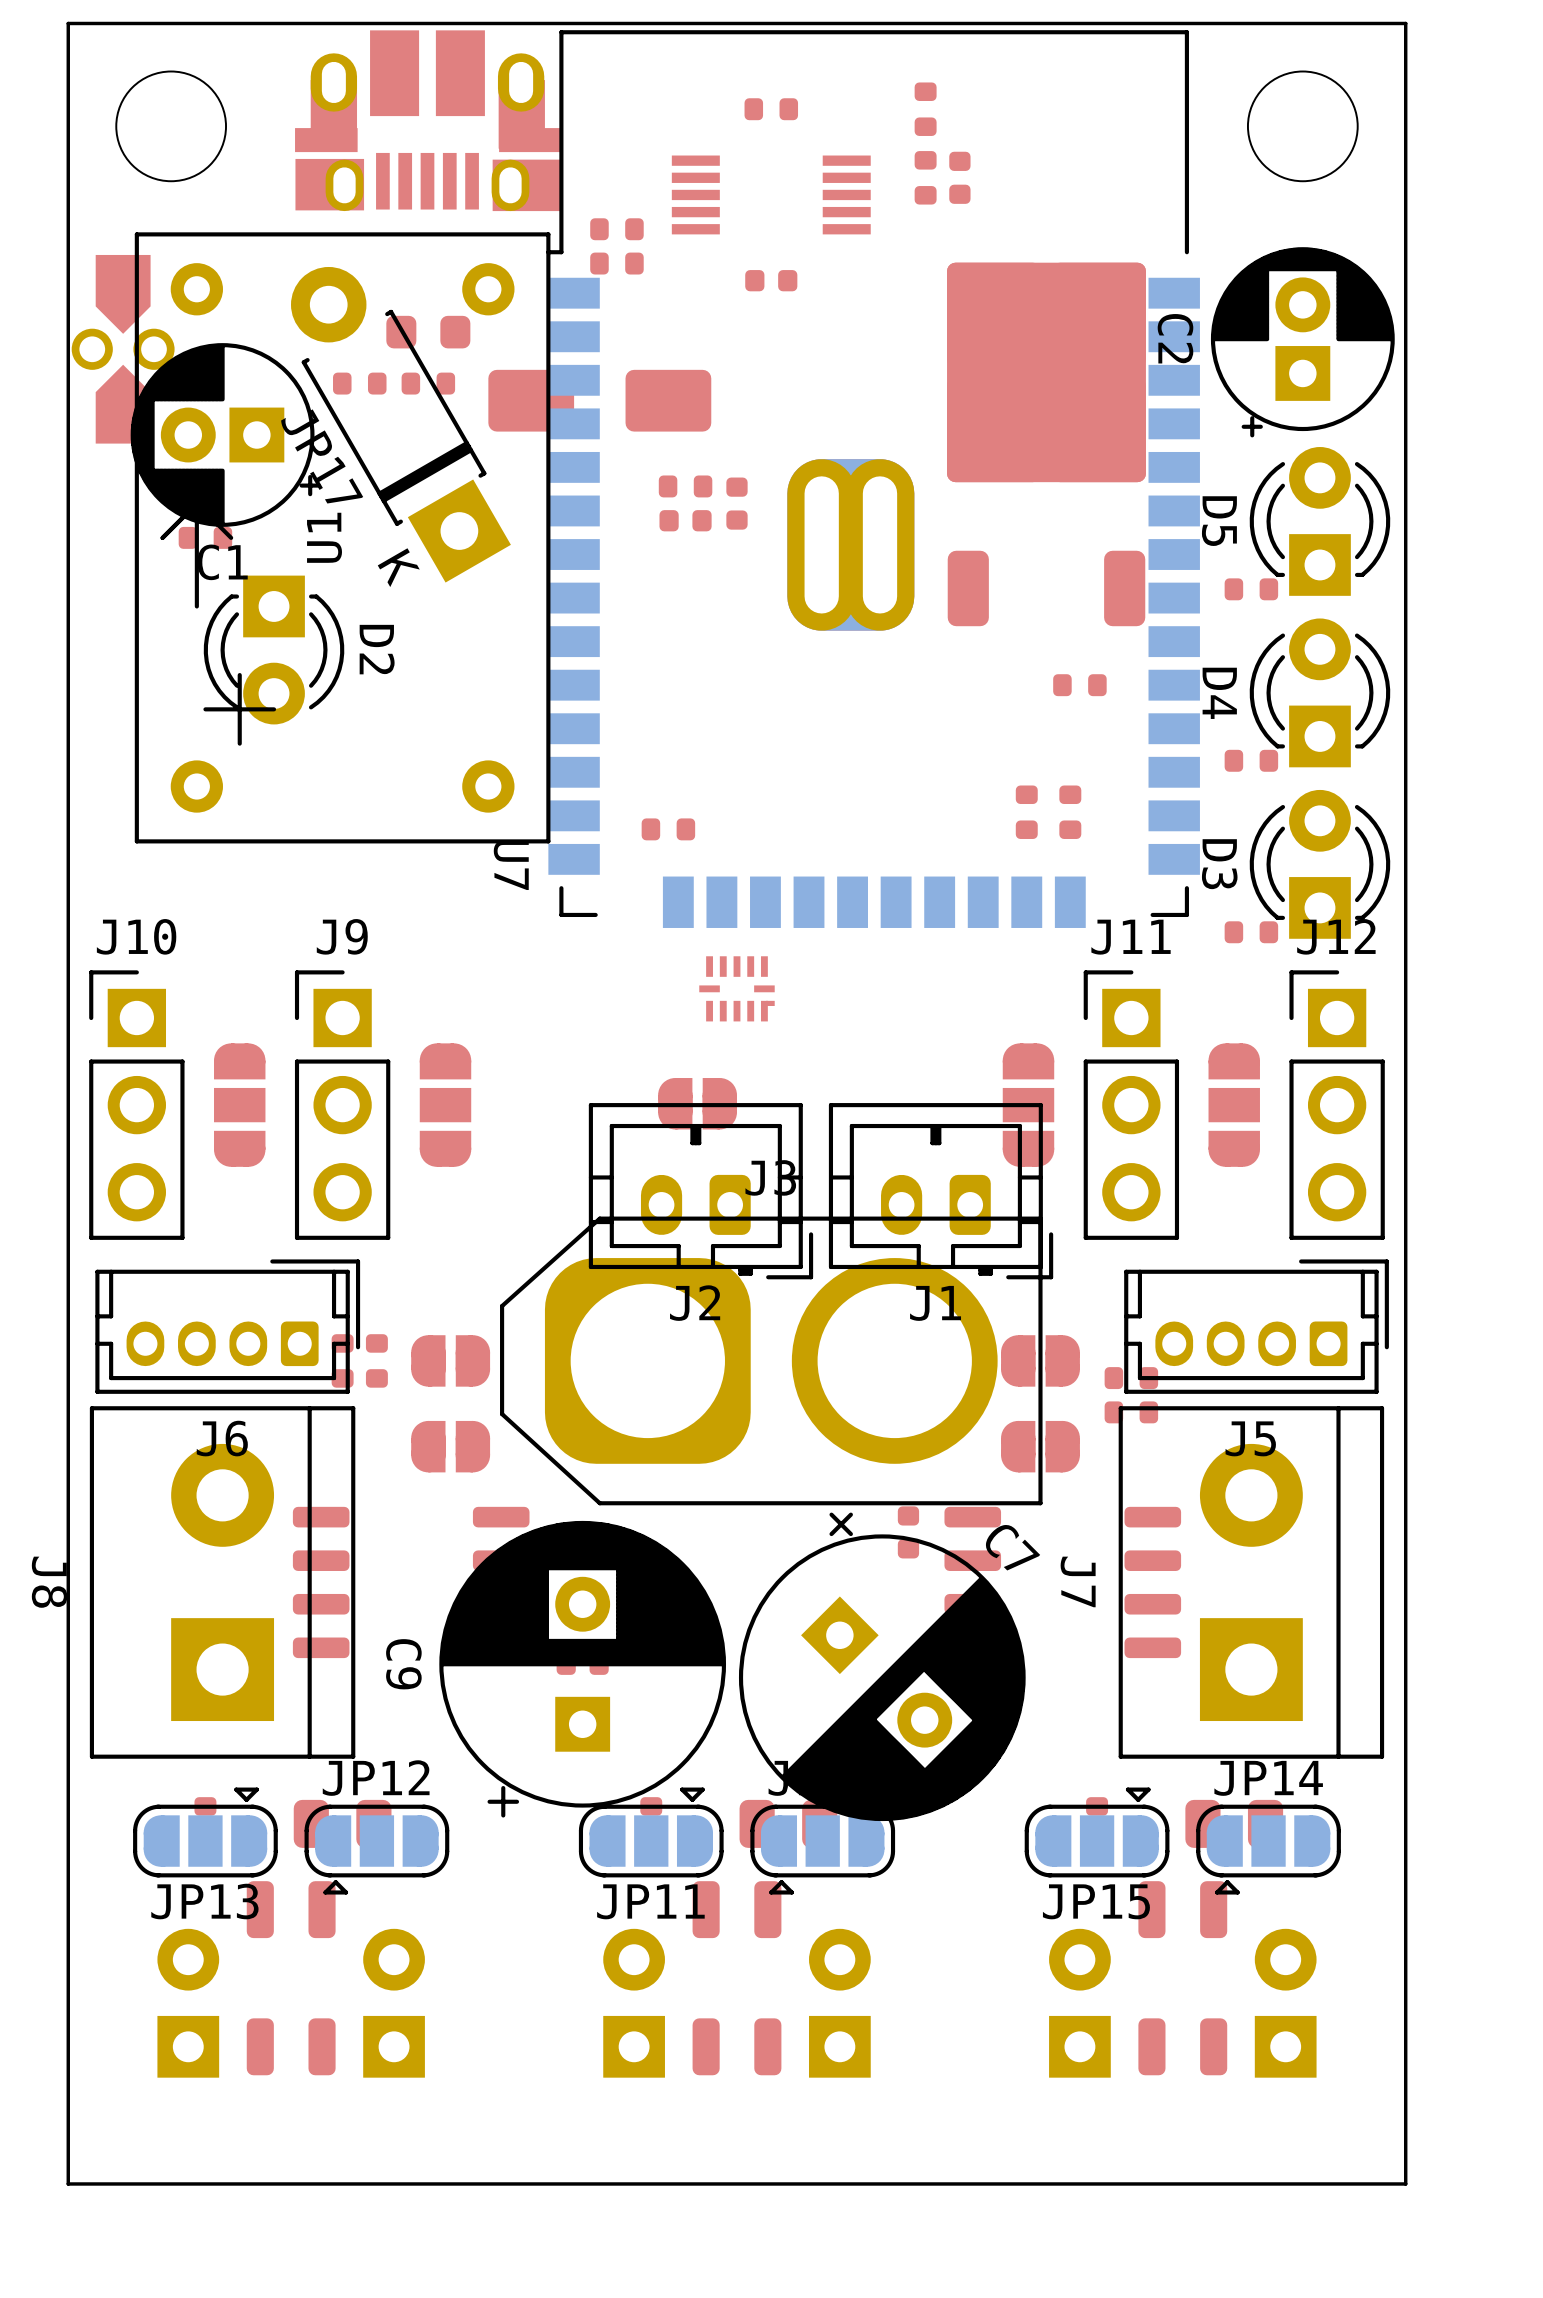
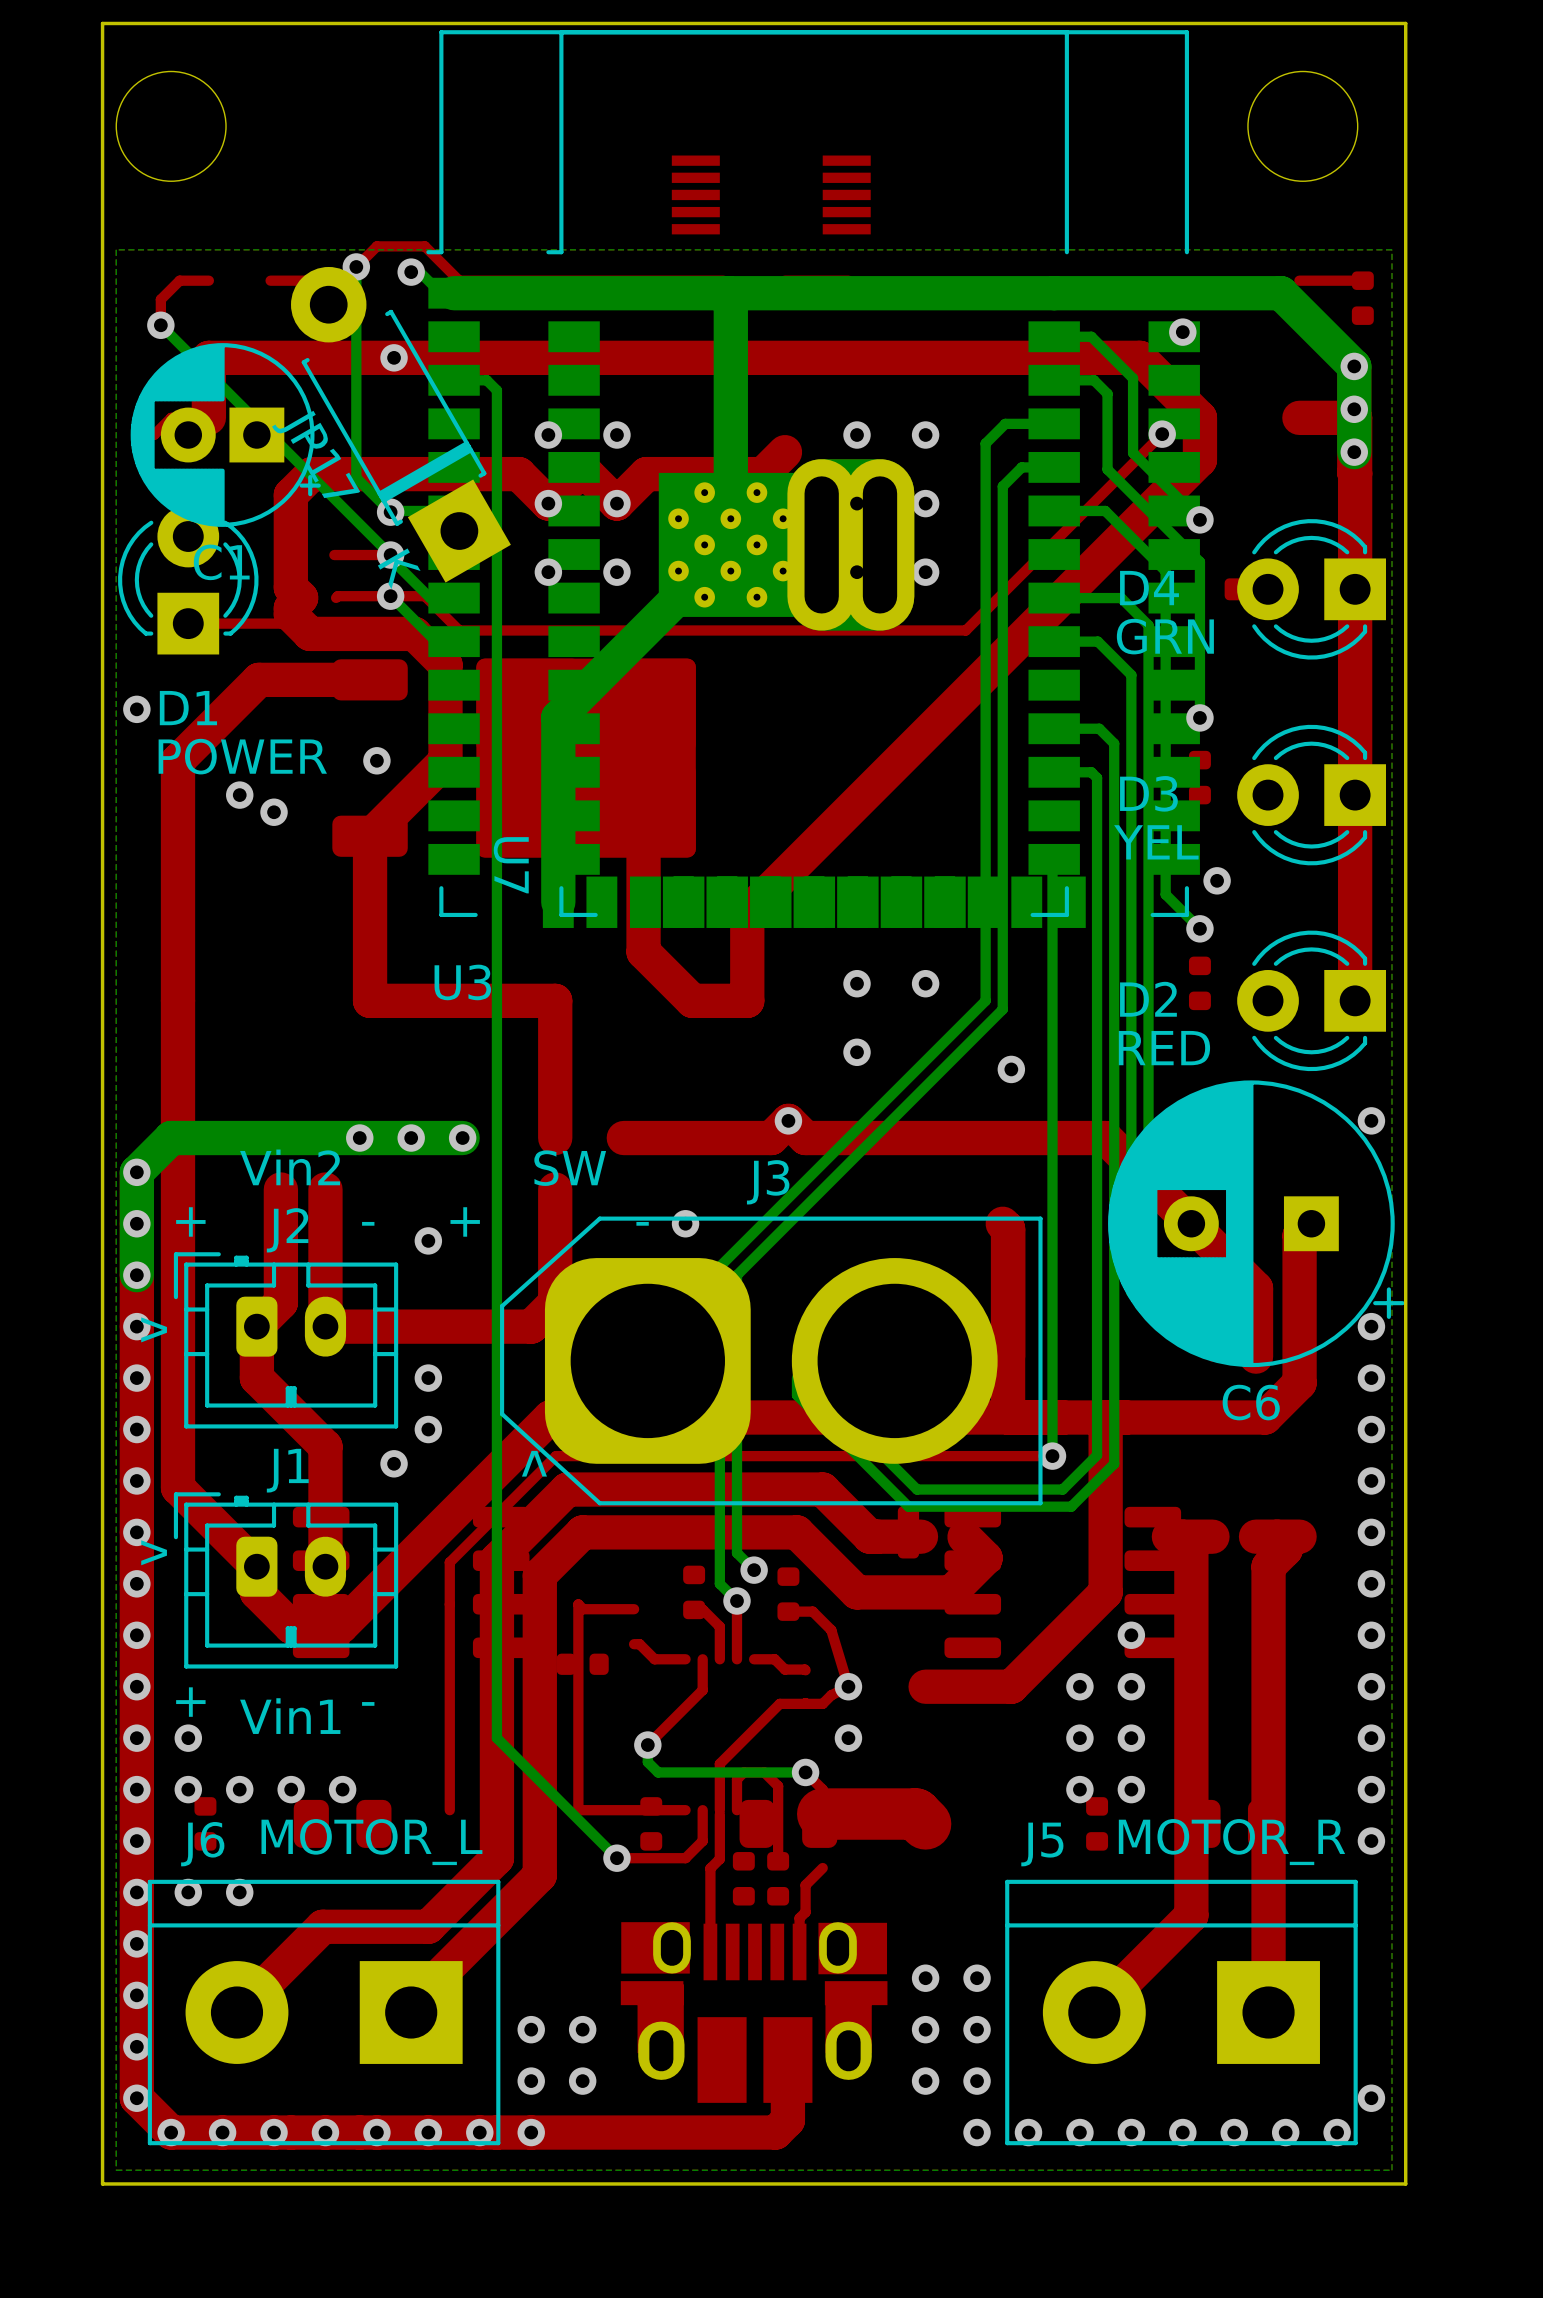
board edge: (102, 23) (68, 23) (68, 2183) (102, 2183) -> (102, 23) (102, 2183)
part: (771, 109) -> none
part: (925, 109) -> none
part: (428, 120) -> none
part: (925, 177) -> none
part: (959, 177) -> none
part: (616, 229) -> none
bottom zone outline: none -> (1391, 249) (116, 249) (116, 2170) (1391, 2170) (1391, 249)
part: (616, 263) -> none
top track: none -> (356, 266) (376, 246) (424, 246) (459, 280) (723, 280)
bottom track: none -> (356, 266) (356, 477) (390, 512) (454, 510)
via: none -> (356, 266)
bottom track: none -> (411, 272) (419, 272) (440, 293) (1281, 293) (1354, 366) (1354, 452)
via: none -> (411, 272)
top track: none -> (208, 280) (179, 280) (160, 299) (160, 325)
top track: none -> (325, 280) (270, 280)
part: (771, 280) -> none
top track: none -> (848, 280) (785, 280)
top track: none -> (1362, 280) (1299, 280)
bottom track: none -> (728, 293) (730, 295) (730, 544) (558, 717) (558, 902)
part: none -> (1362, 298)
bottom track: none -> (160, 325) (390, 555) (390, 558) (430, 598) (454, 598)
via: none -> (160, 325)
part: (428, 332) -> none
via: none -> (1182, 332)
bottom track: none -> (1054, 336) (1091, 336) (1133, 378) (1133, 453) (1199, 519)
C2: (1302, 342) -> none
part: (123, 349) -> none
via: none -> (394, 357)
via: none -> (1354, 366)
bottom track: none -> (454, 380) (486, 380) (496, 390) (496, 1738) (616, 1858)
bottom track: none -> (1054, 380) (1093, 380) (1107, 393) (1107, 469) (1199, 561) (1199, 717)
part: (359, 383) -> none
part: (428, 383) -> none
part: (599, 400) -> none
via: none -> (1354, 409)
top track: none -> (1299, 417) (1355, 417) (1355, 1000)
bottom track: none -> (1054, 423) (1005, 423) (985, 443) (985, 1000) (719, 1266) (719, 1583) (736, 1600)
top track: none -> (154, 434) (171, 417) (208, 417) (208, 357) (1139, 357) (1199, 417) (1199, 459) (747, 912) (747, 1000) (692, 1000) (643, 951) (643, 810)
top track: none -> (1162, 434) (965, 630) (459, 630) (424, 596) (337, 596) (336, 597)
via: none -> (1162, 434)
via: none -> (548, 435)
via: none -> (616, 435)
via: none -> (857, 435)
via: none -> (925, 435)
part rotation: 0° (1046, 444) -> 90° clockwise (514, 758)
part position: (1046, 444) -> (514, 758)
top track: none -> (785, 452) (763, 474) (646, 474) (616, 503) (587, 474) (577, 474) (548, 503) (518, 474) (311, 474) (290, 495) (290, 587) (301, 597) (290, 608) (290, 614)
via: none -> (1354, 452)
bottom track: none -> (1054, 467) (1021, 467) (1002, 486) (1002, 1009) (736, 1275) (736, 1552) (754, 1570)
U3: none -> (753, 479)
part: (685, 486) -> none
via: none -> (548, 503)
via: none -> (616, 503)
part: (736, 503) -> none
via: none -> (857, 503)
via: none -> (925, 503)
bottom track: none -> (1054, 510) (1105, 510) (1165, 571) (1165, 894) (1199, 928)
via: none -> (390, 512)
via: none -> (1199, 519)
part: (685, 520) -> none
D5: (1319, 521) -> none
part: (205, 537) -> none
U1: (342, 537) -> none
top track: none -> (390, 555) (334, 555)
via: none -> (390, 555)
via: none -> (548, 572)
via: none -> (616, 572)
via: none -> (857, 572)
via: none -> (925, 572)
D1: none -> (188, 580)
bottom track: none -> (390, 596) (436, 641) (454, 641)
via: none -> (390, 596)
bottom track: none -> (1054, 598) (1121, 598) (1148, 625) (1148, 1258) (1182, 1292)
top track: none -> (290, 614) (281, 623) (188, 623)
top track: none -> (290, 614) (310, 633) (414, 633) (445, 664) (445, 760) (370, 836) (370, 1000) (555, 1000) (555, 1138)
text: none -> GRN (1165, 636)
bottom track: none -> (1054, 641) (1097, 641) (1131, 675) (1131, 1292) (1139, 1300)
D2 name position: D2 (377, 649) -> D2 (1148, 999)
D2 rotation: 0° (274, 650) -> 90° clockwise (1311, 1000)
D2 position: (274, 650) -> (1311, 1000)
top track: none -> (370, 679) (258, 679) (178, 760) (178, 1487) (256, 1566) (256, 1592) (291, 1626) (340, 1626) (550, 1417) (1265, 1417) (1299, 1383) (1299, 1235) (1311, 1223)
part: (1079, 685) -> none
D4 rotation: 0° (1319, 692) -> 90° counterclockwise (1311, 589)
D4 position: (1319, 692) -> (1311, 589)
via: none -> (136, 709)
via: none -> (1199, 717)
bottom track: none -> (1054, 728) (1099, 728) (1114, 743) (1114, 1463) (1071, 1506) (908, 1506) (797, 1395) (797, 1378)
text: none -> POWER (242, 756)
via: none -> (376, 760)
part rotation: 0° (1251, 760) -> 90° clockwise (1199, 777)
part position: (1251, 760) -> (1199, 777)
bottom track: none -> (1054, 772) (1091, 772) (1097, 777) (1097, 1455) (1062, 1489) (917, 1489) (831, 1403) (831, 1378)
via: none -> (239, 795)
via: none -> (274, 812)
part: (1026, 812) -> none
part: (1070, 812) -> none
part: (668, 829) -> none
text: none -> YEL (1156, 842)
bottom track: none -> (1054, 859) (1052, 861) (1052, 1450)
D3 rotation: 0° (1319, 864) -> 90° counterclockwise (1311, 795)
via: none -> (1217, 880)
via: none -> (1199, 928)
part rotation: 0° (1251, 932) -> 90° clockwise (1199, 983)
part position: (1251, 932) -> (1199, 983)
via: none -> (857, 983)
via: none -> (925, 983)
part: (736, 988) -> none
text: none -> RED (1164, 1048)
via: none -> (857, 1052)
via: none -> (1011, 1069)
part: (697, 1103) -> none
J10: (136, 1105) -> none
part: (239, 1105) -> none
J9: (342, 1105) -> none
part: (445, 1105) -> none
part: (1028, 1105) -> none
J11: (1131, 1105) -> none
part: (1234, 1105) -> none
J12: (1337, 1105) -> none
via: none -> (788, 1120)
via: none -> (1371, 1120)
via: none -> (359, 1138)
via: none -> (411, 1138)
bottom track: none -> (462, 1138) (171, 1138) (136, 1172) (136, 1275)
via: none -> (462, 1138)
top track: none -> (623, 1138) (771, 1138) (788, 1120) (805, 1138) (1105, 1138) (1256, 1288) (1256, 1356)
text: none -> Vin2 (290, 1167)
text: none -> SW (570, 1168)
top track: none -> (136, 1172) (136, 2098) (171, 2132) (775, 2132) (787, 2120) (787, 2060)
via: none -> (136, 1172)
top track: none -> (280, 1189) (280, 1302) (256, 1326) (256, 1378) (325, 1446) (325, 1566)
top track: none -> (555, 1189) (555, 1302) (531, 1326) (325, 1326) (325, 1189)
J2 rotation: 0° (700, 1191) -> 180° (286, 1340)
J2 position: (700, 1191) -> (286, 1340)
J1 rotation: 0° (941, 1191) -> 180° (286, 1580)
J1 position: (941, 1191) -> (286, 1580)
text: none -> + (190, 1221)
text: none -> + (465, 1221)
via: none -> (136, 1223)
text: none -> - (368, 1223)
text: none -> - (642, 1223)
via: none -> (685, 1223)
top track: none -> (1002, 1223) (1008, 1229) (1008, 1417)
C6: none -> (1256, 1223)
via: none -> (428, 1240)
J6 footprint: [95, 1259, 361, 1394] -> [147, 1879, 501, 2146]
J5 footprint: [1124, 1259, 1389, 1394] -> [1005, 1879, 1358, 2146]
via: none -> (136, 1275)
via: none -> (136, 1326)
via: none -> (1371, 1326)
text: none -> v (154, 1329)
part: (342, 1360) -> none
part: (376, 1360) -> none
part: (450, 1360) -> none
part: (1040, 1360) -> none
via: none -> (136, 1378)
via: none -> (428, 1378)
part: (1131, 1378) -> none
via: none -> (1371, 1378)
part: (1131, 1412) -> none
top track: none -> (1105, 1417) (1105, 1592) (1011, 1686) (925, 1686)
via: none -> (136, 1429)
via: none -> (428, 1429)
via: none -> (1371, 1429)
J6 name position: J6 (222, 1438) -> J6 (202, 1844)
J5 name position: J5 (1250, 1438) -> J5 (1042, 1844)
part: (450, 1446) -> none
part: (1040, 1446) -> none
top track: none -> (1052, 1456) (556, 1456) (449, 1562) (449, 1810)
via: none -> (1052, 1456)
via: none -> (394, 1463)
text: none -> v (534, 1463)
via: none -> (136, 1480)
via: none -> (1371, 1480)
via: none -> (136, 1532)
via: none -> (1371, 1532)
top track: none -> (920, 1536) (869, 1536) (822, 1489) (567, 1489) (496, 1559) (496, 1858) (428, 1926) (322, 1926) (236, 2012)
top track: none -> (1182, 1536) (1191, 1545) (1191, 1915) (1094, 2012)
top track: none -> (1212, 1536) (1168, 1536)
top track: none -> (1277, 1536) (1285, 1545) (1285, 1549) (1268, 1566) (1268, 2012)
top track: none -> (1299, 1536) (1256, 1536)
top track: none -> (964, 1537) (985, 1558) (951, 1592) (857, 1592) (797, 1532) (582, 1532) (539, 1575) (539, 1875) (411, 2003) (411, 2012)
text: none -> v (154, 1552)
via: none -> (754, 1570)
J8: (222, 1582) -> none
J7: (1251, 1582) -> none
via: none -> (136, 1583)
via: none -> (1371, 1583)
part: none -> (694, 1592)
part: none -> (788, 1594)
top track: none -> (736, 1600) (736, 1659)
via: none -> (736, 1600)
top track: none -> (634, 1609) (583, 1609) (578, 1604) (578, 1810) (685, 1810)
top track: none -> (694, 1609) (703, 1609) (719, 1626) (719, 1659)
top track: none -> (788, 1611) (812, 1611) (831, 1630) (848, 1686) (831, 1695) (822, 1703) (779, 1703) (719, 1763) (719, 1810)
via: none -> (136, 1635)
via: none -> (1131, 1635)
via: none -> (1371, 1635)
top track: none -> (634, 1644) (639, 1644) (654, 1659) (685, 1659)
top track: none -> (702, 1659) (702, 1690) (647, 1745)
top track: none -> (754, 1659) (774, 1659) (785, 1669) (805, 1670)
C7: (882, 1666) -> none
C9: (582, 1669) -> none
via: none -> (136, 1686)
via: none -> (848, 1686)
via: none -> (1079, 1686)
via: none -> (1131, 1686)
via: none -> (1371, 1686)
text: none -> + (190, 1702)
text: none -> - (368, 1703)
text: none -> Vin1 (290, 1716)
via: none -> (136, 1738)
via: none -> (188, 1738)
via: none -> (848, 1738)
via: none -> (1079, 1738)
via: none -> (1131, 1738)
via: none -> (1371, 1738)
bottom track: none -> (647, 1745) (647, 1762) (658, 1772) (805, 1772)
via: none -> (647, 1745)
top track: none -> (805, 1772) (822, 1789) (822, 1814) (915, 1814) (925, 1823)
via: none -> (805, 1772)
via: none -> (136, 1789)
via: none -> (188, 1789)
via: none -> (239, 1789)
via: none -> (291, 1789)
via: none -> (342, 1789)
via: none -> (1079, 1789)
via: none -> (1131, 1789)
via: none -> (1371, 1789)
top track: none -> (702, 1810) (702, 1841) (685, 1858) (616, 1858)
top track: none -> (736, 1810) (736, 1779) (743, 1772) (764, 1772) (778, 1786) (778, 1861)
top track: none -> (719, 1814) (719, 1859) (710, 1868) (710, 1948)
JP13: (205, 1832) -> none
JP11: (651, 1832) -> none
JP15: (1097, 1832) -> none
via: none -> (136, 1841)
via: none -> (1371, 1841)
text: none -> MOTOR_L (371, 1842)
text: none -> MOTOR_R (1231, 1842)
JP12: (376, 1849) -> none
part: (822, 1849) -> none
JP14: (1268, 1849) -> none
via: none -> (616, 1858)
top track: none -> (822, 1868) (805, 1885) (805, 1912) (799, 1918) (799, 1951)
part: none -> (743, 1878)
part: none -> (778, 1878)
via: none -> (136, 1892)
via: none -> (188, 1892)
via: none -> (239, 1892)
via: none -> (136, 1943)
part: (291, 1978) -> none
part: (736, 1978) -> none
via: none -> (925, 1978)
via: none -> (977, 1978)
part: (1182, 1978) -> none
via: none -> (136, 1995)
part: (188, 2003) -> none
part: (394, 2003) -> none
part: (634, 2003) -> none
part: (839, 2003) -> none
part: (1079, 2003) -> none
part: (1285, 2003) -> none
part: none -> (754, 2012)
via: none -> (531, 2029)
via: none -> (582, 2029)
via: none -> (925, 2029)
via: none -> (977, 2029)
via: none -> (136, 2046)
via: none -> (531, 2081)
via: none -> (582, 2081)
via: none -> (925, 2081)
via: none -> (977, 2081)
via: none -> (136, 2098)
via: none -> (1371, 2098)
via: none -> (171, 2132)
via: none -> (222, 2132)
via: none -> (274, 2132)
via: none -> (325, 2132)
via: none -> (376, 2132)
via: none -> (428, 2132)
via: none -> (479, 2132)
via: none -> (531, 2132)
via: none -> (977, 2132)
via: none -> (1028, 2132)
via: none -> (1079, 2132)
via: none -> (1131, 2132)
via: none -> (1182, 2132)
via: none -> (1234, 2132)
via: none -> (1285, 2132)
via: none -> (1337, 2132)

